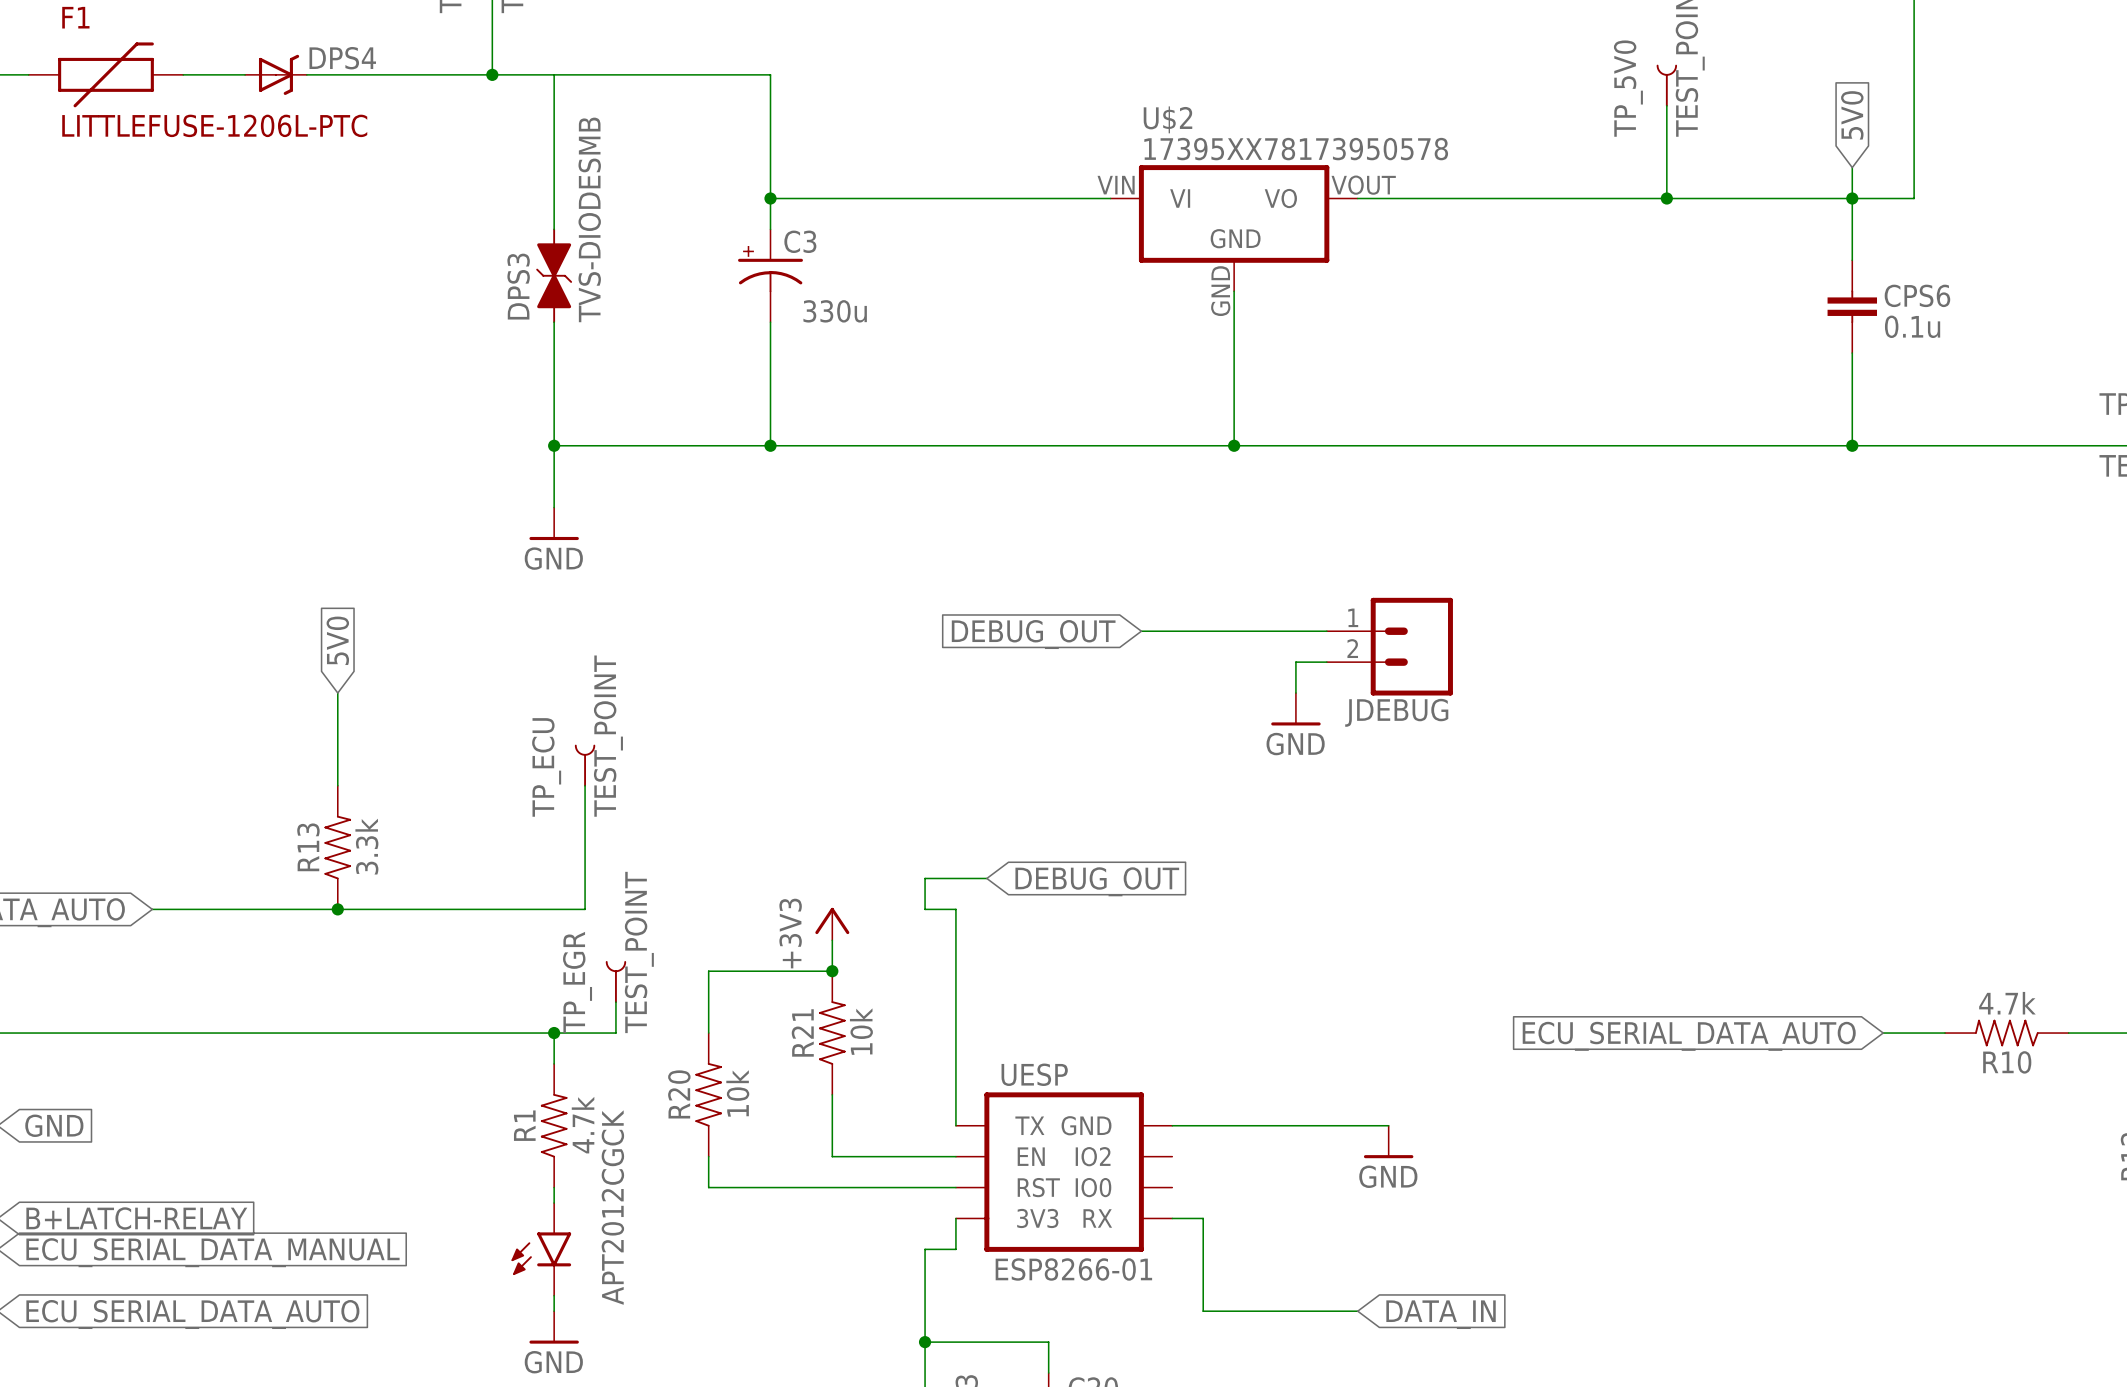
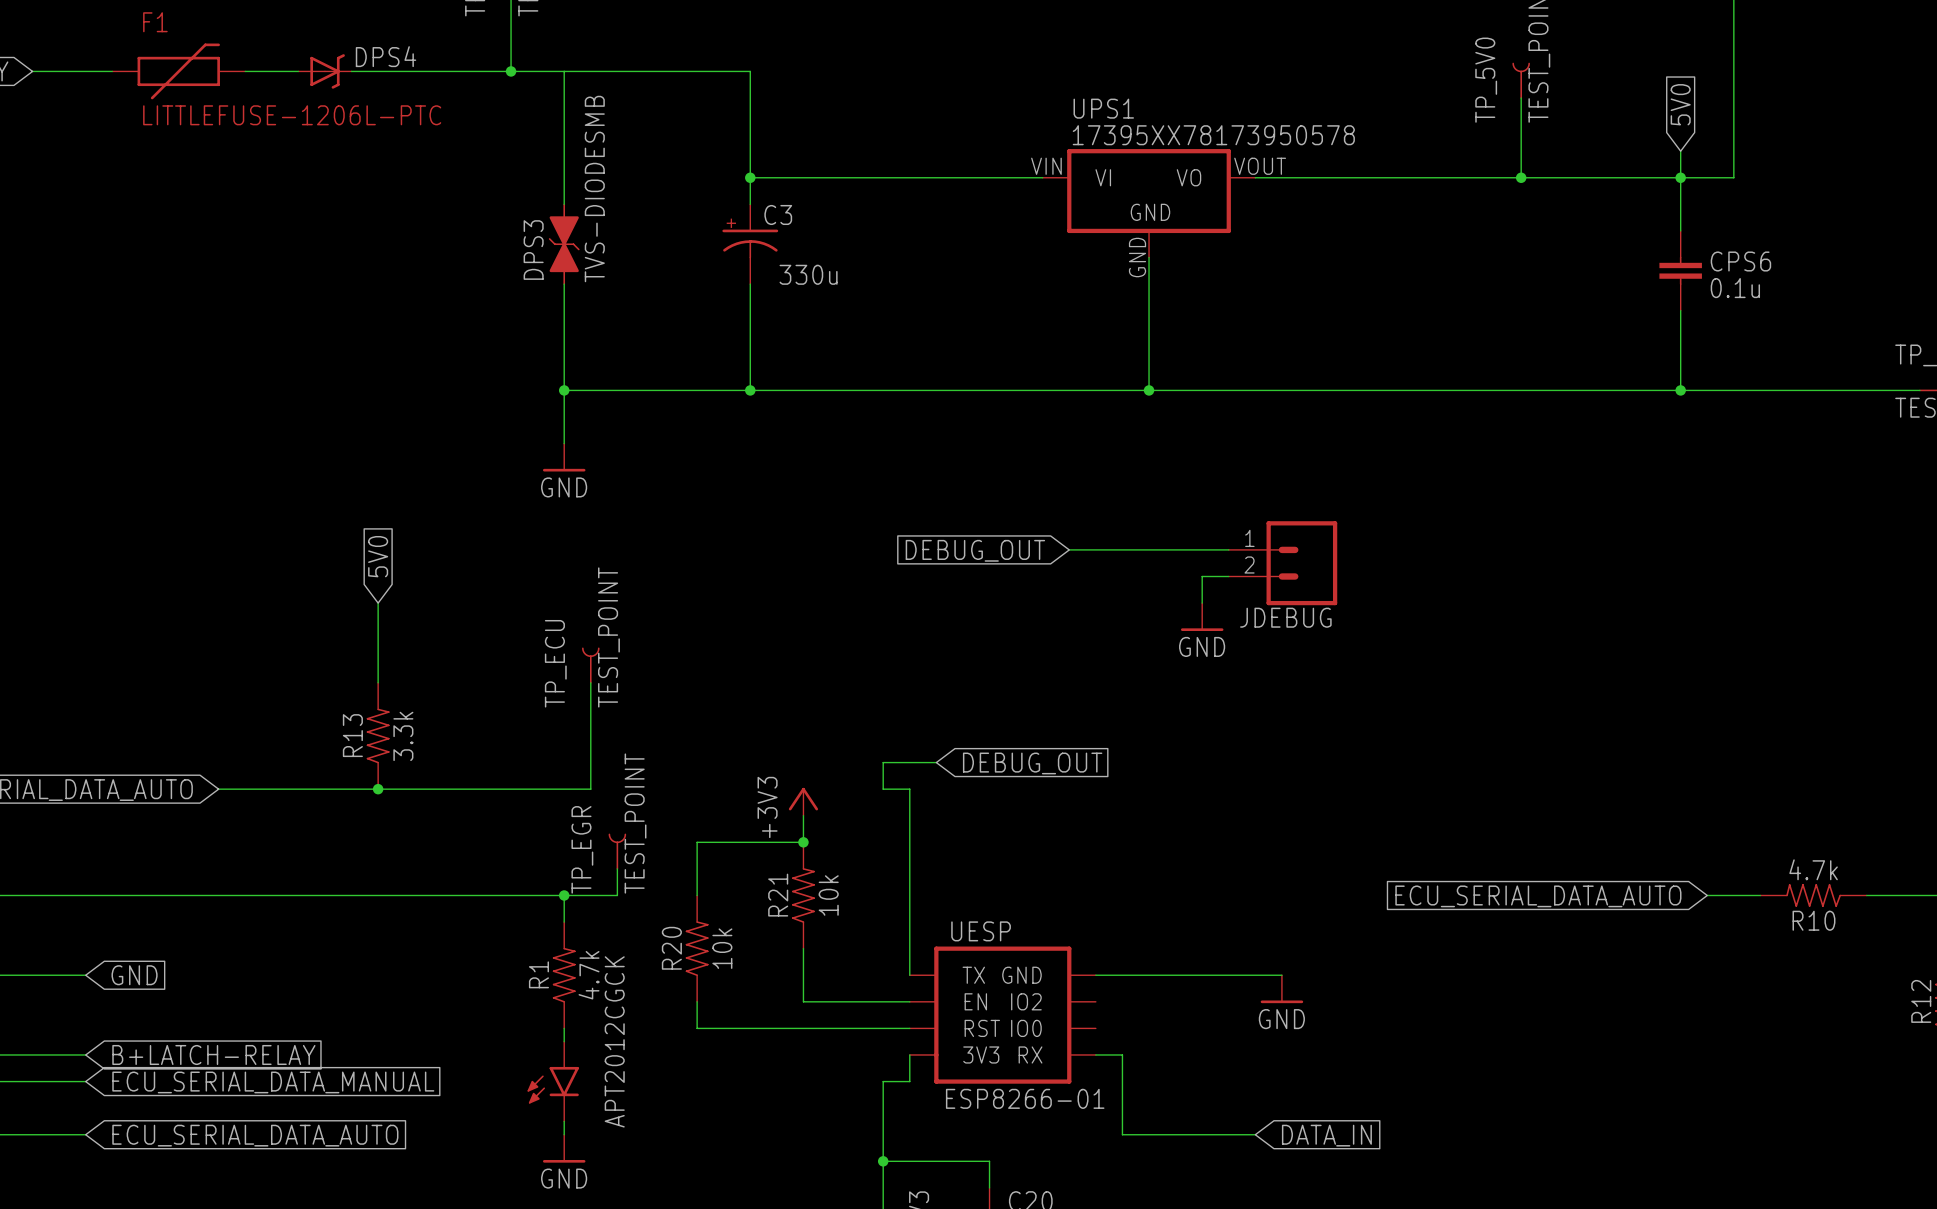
U$2 name: U$2 (1167, 119) -> UPS1 (1103, 108)

